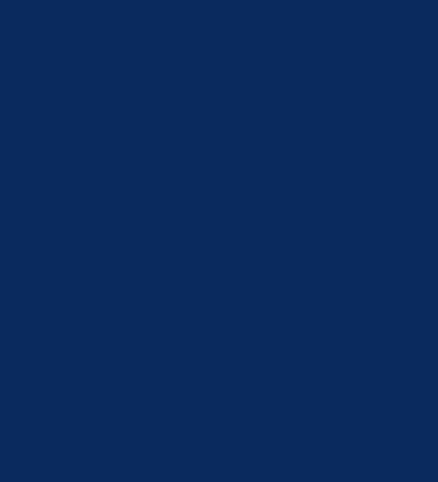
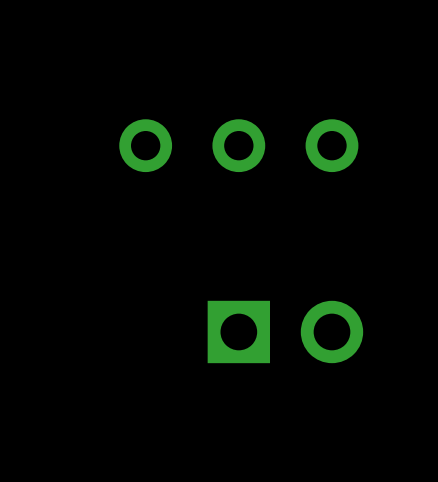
part: none -> (238, 145)
part: none -> (285, 331)

